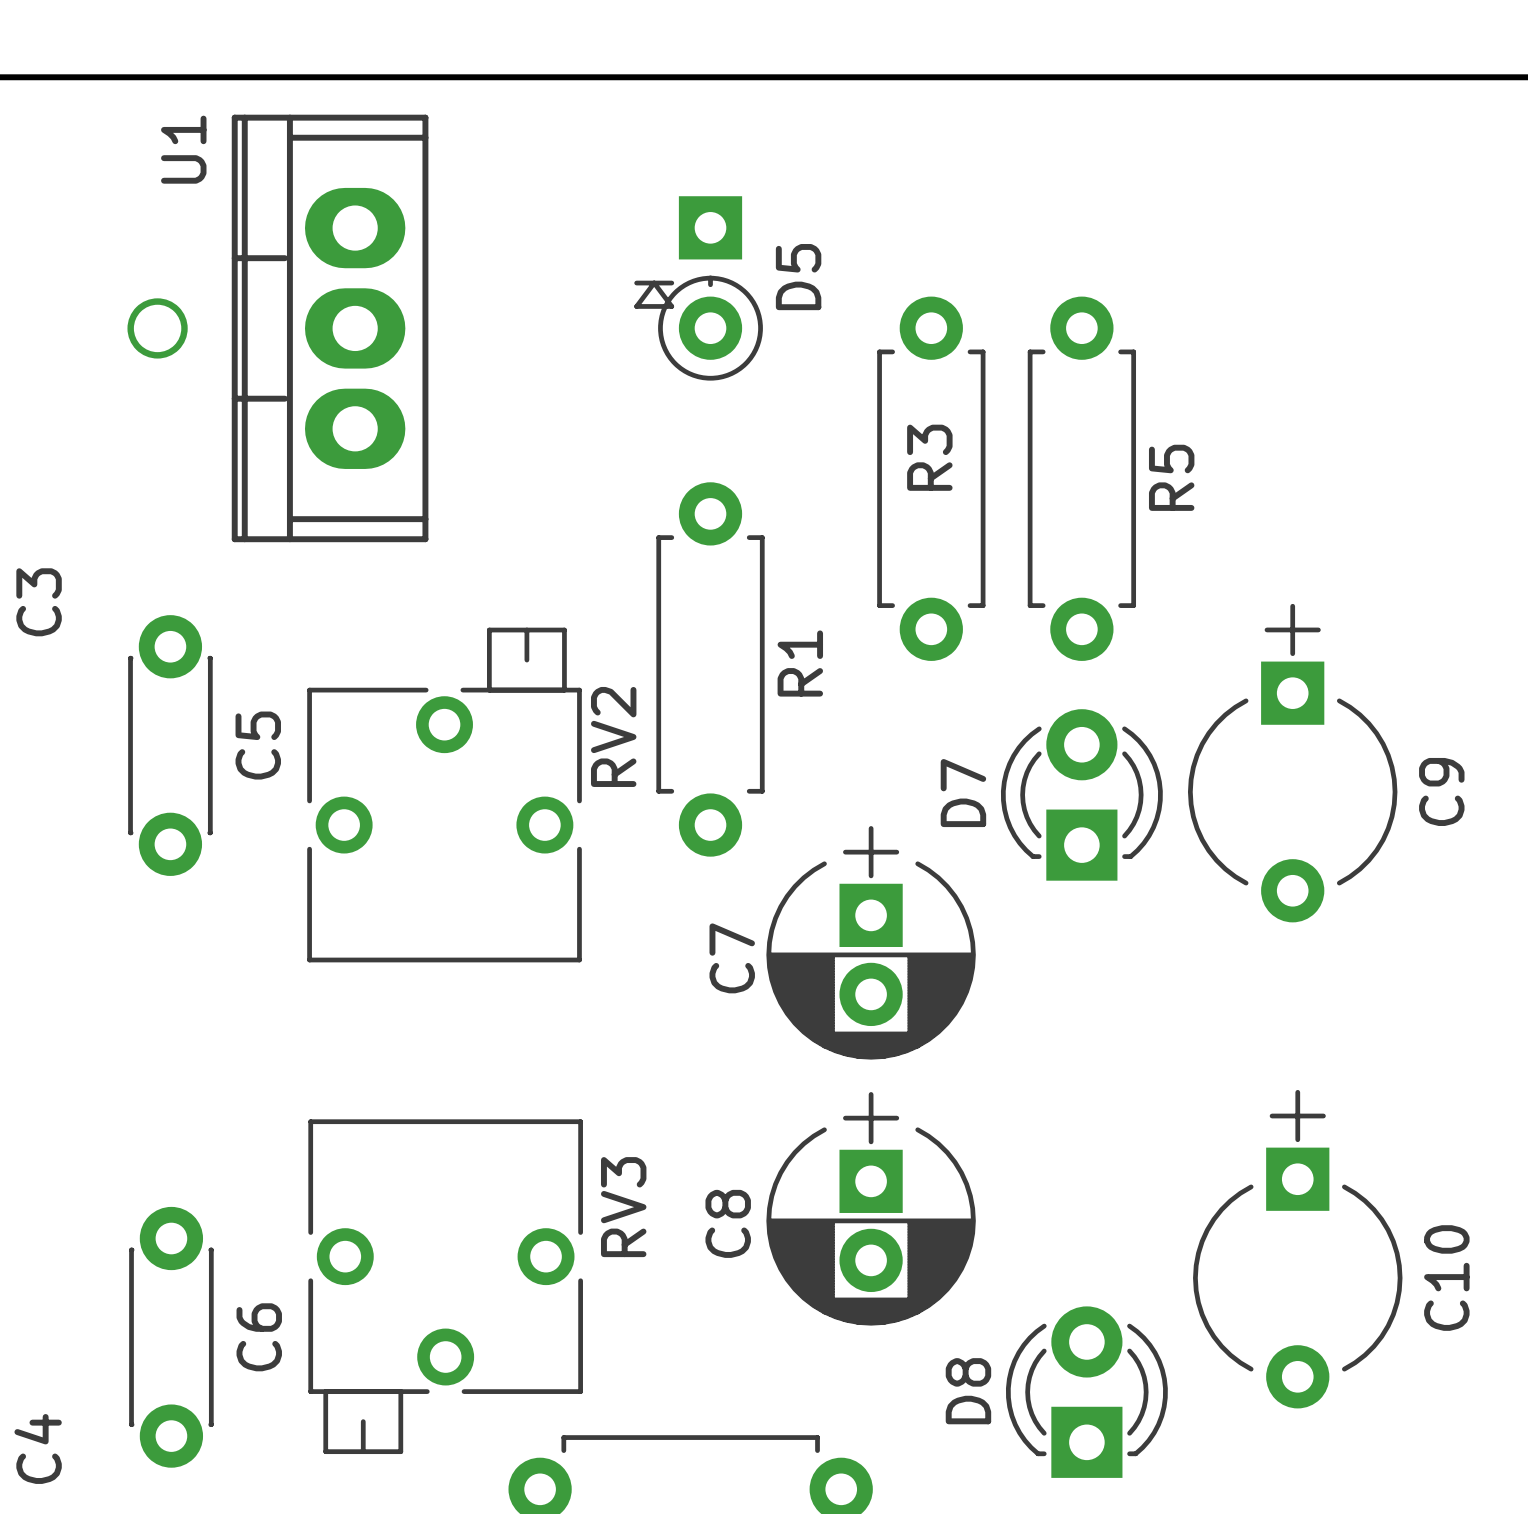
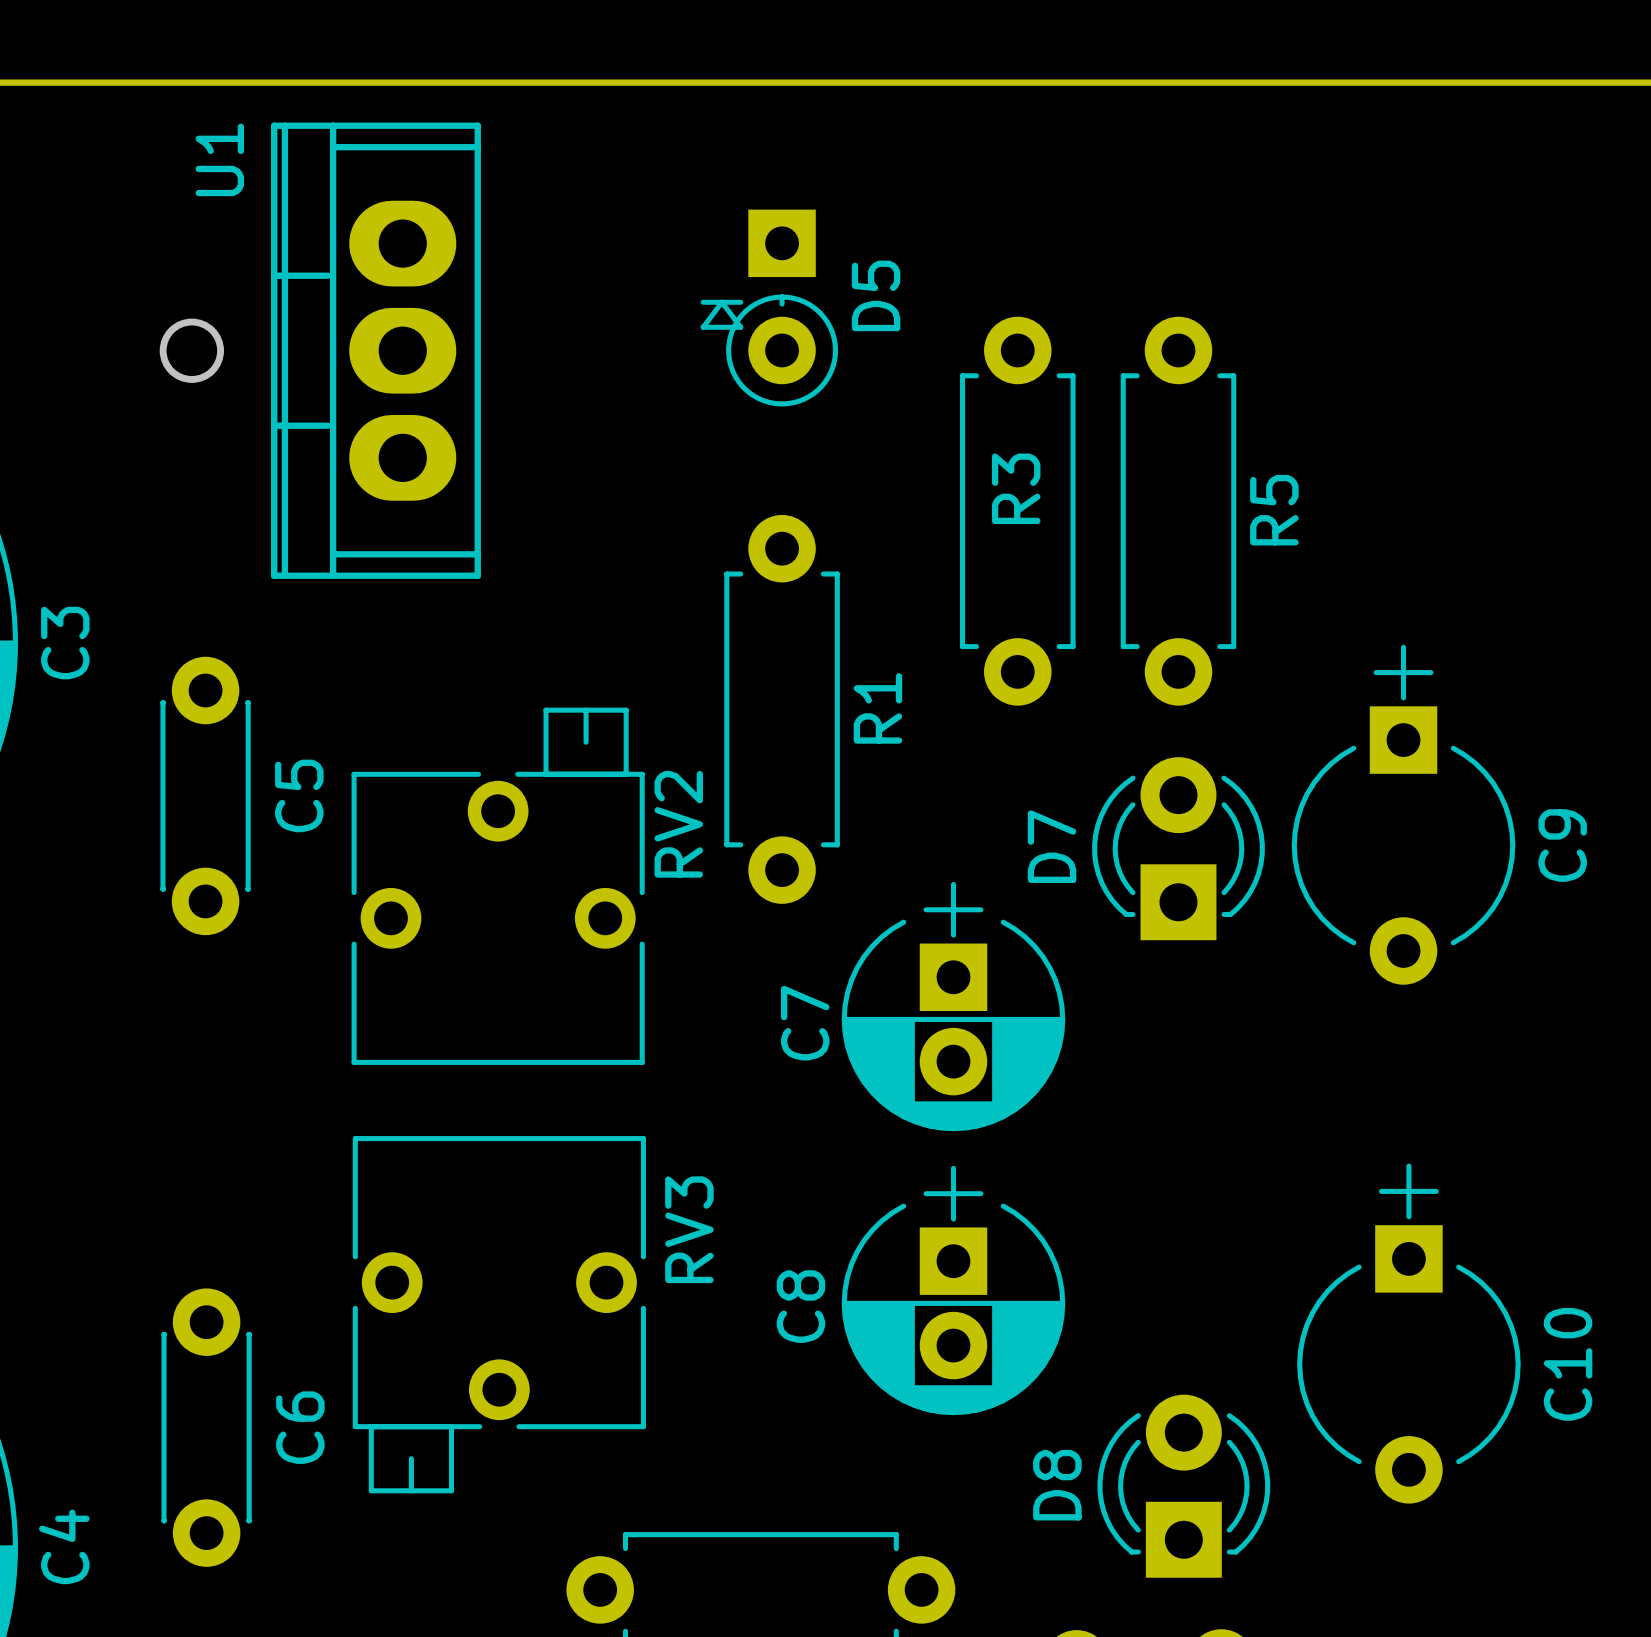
R1 footprint: [656, 482, 765, 857] -> [724, 514, 840, 904]
RV2 position: (444, 795) -> (498, 886)
RV3 position: (445, 1286) -> (499, 1314)

